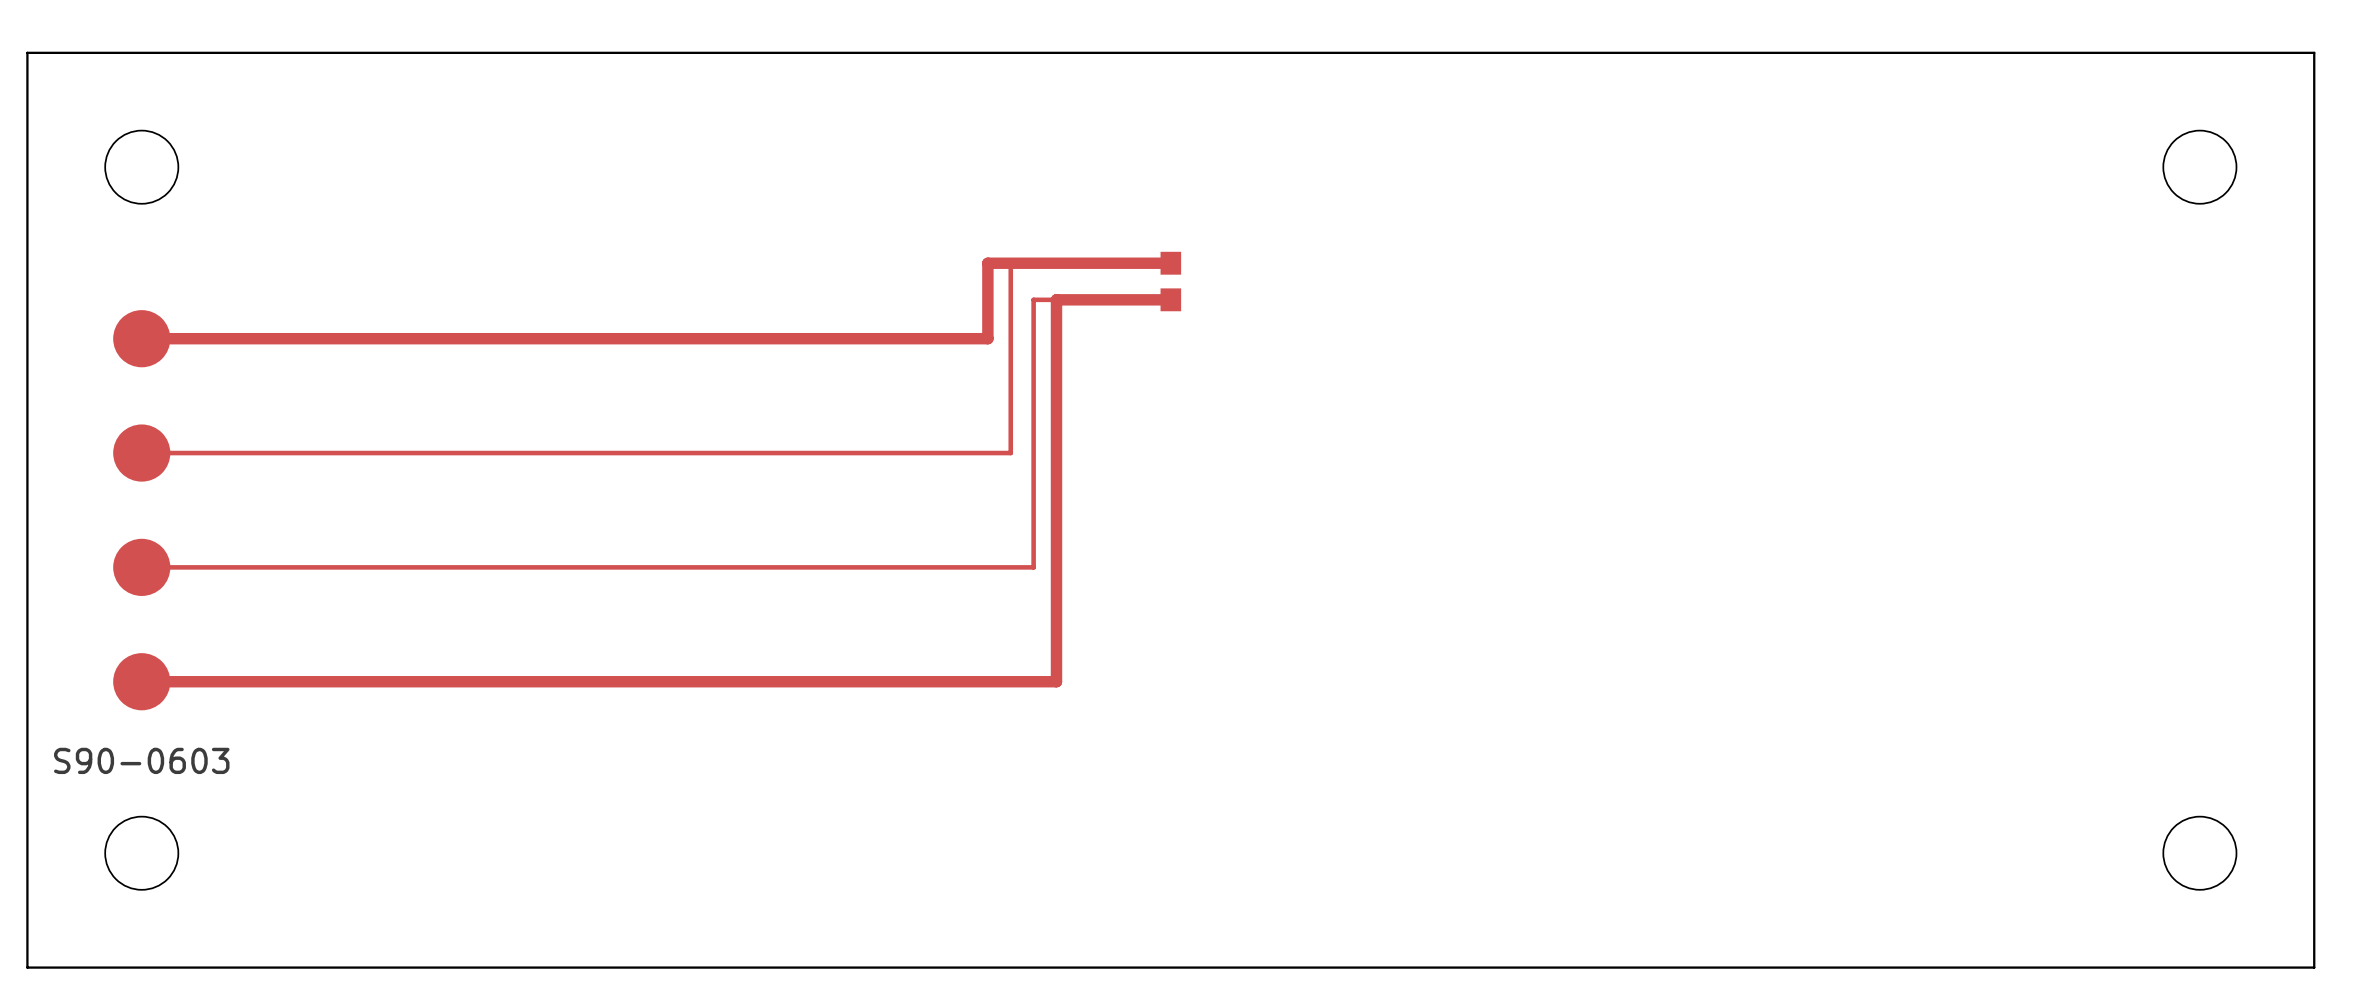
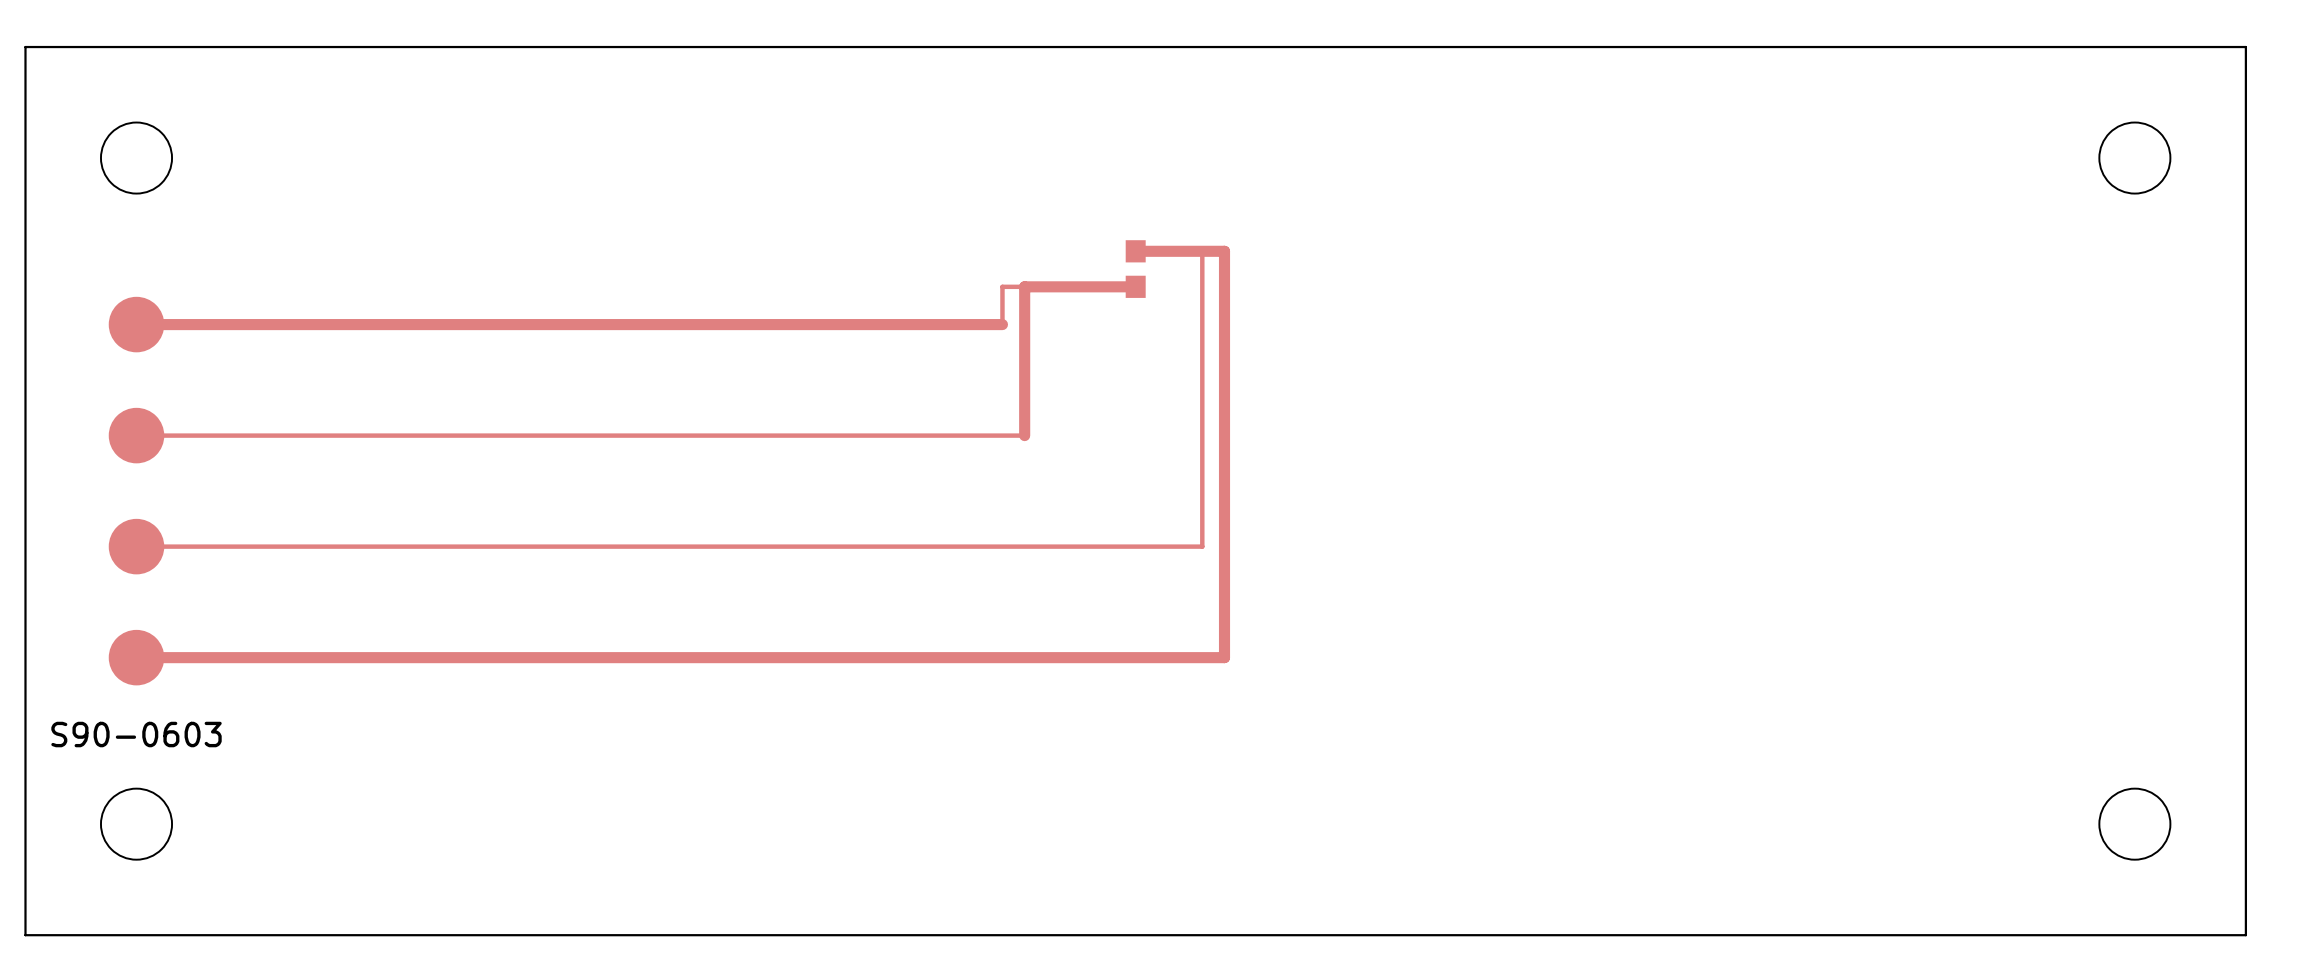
top track: (987, 338) (987, 263) (1170, 263) (1010, 263) (1010, 453) -> (958, 324) (1002, 324)
top track: (1033, 338) (1033, 567) -> none
top track: none -> (980, 435) (1024, 435)
top track: (1056, 453) (1056, 681) -> (1002, 546) (1202, 546) (1202, 251) (1135, 251) (1224, 251) (1224, 657) (1024, 657)

